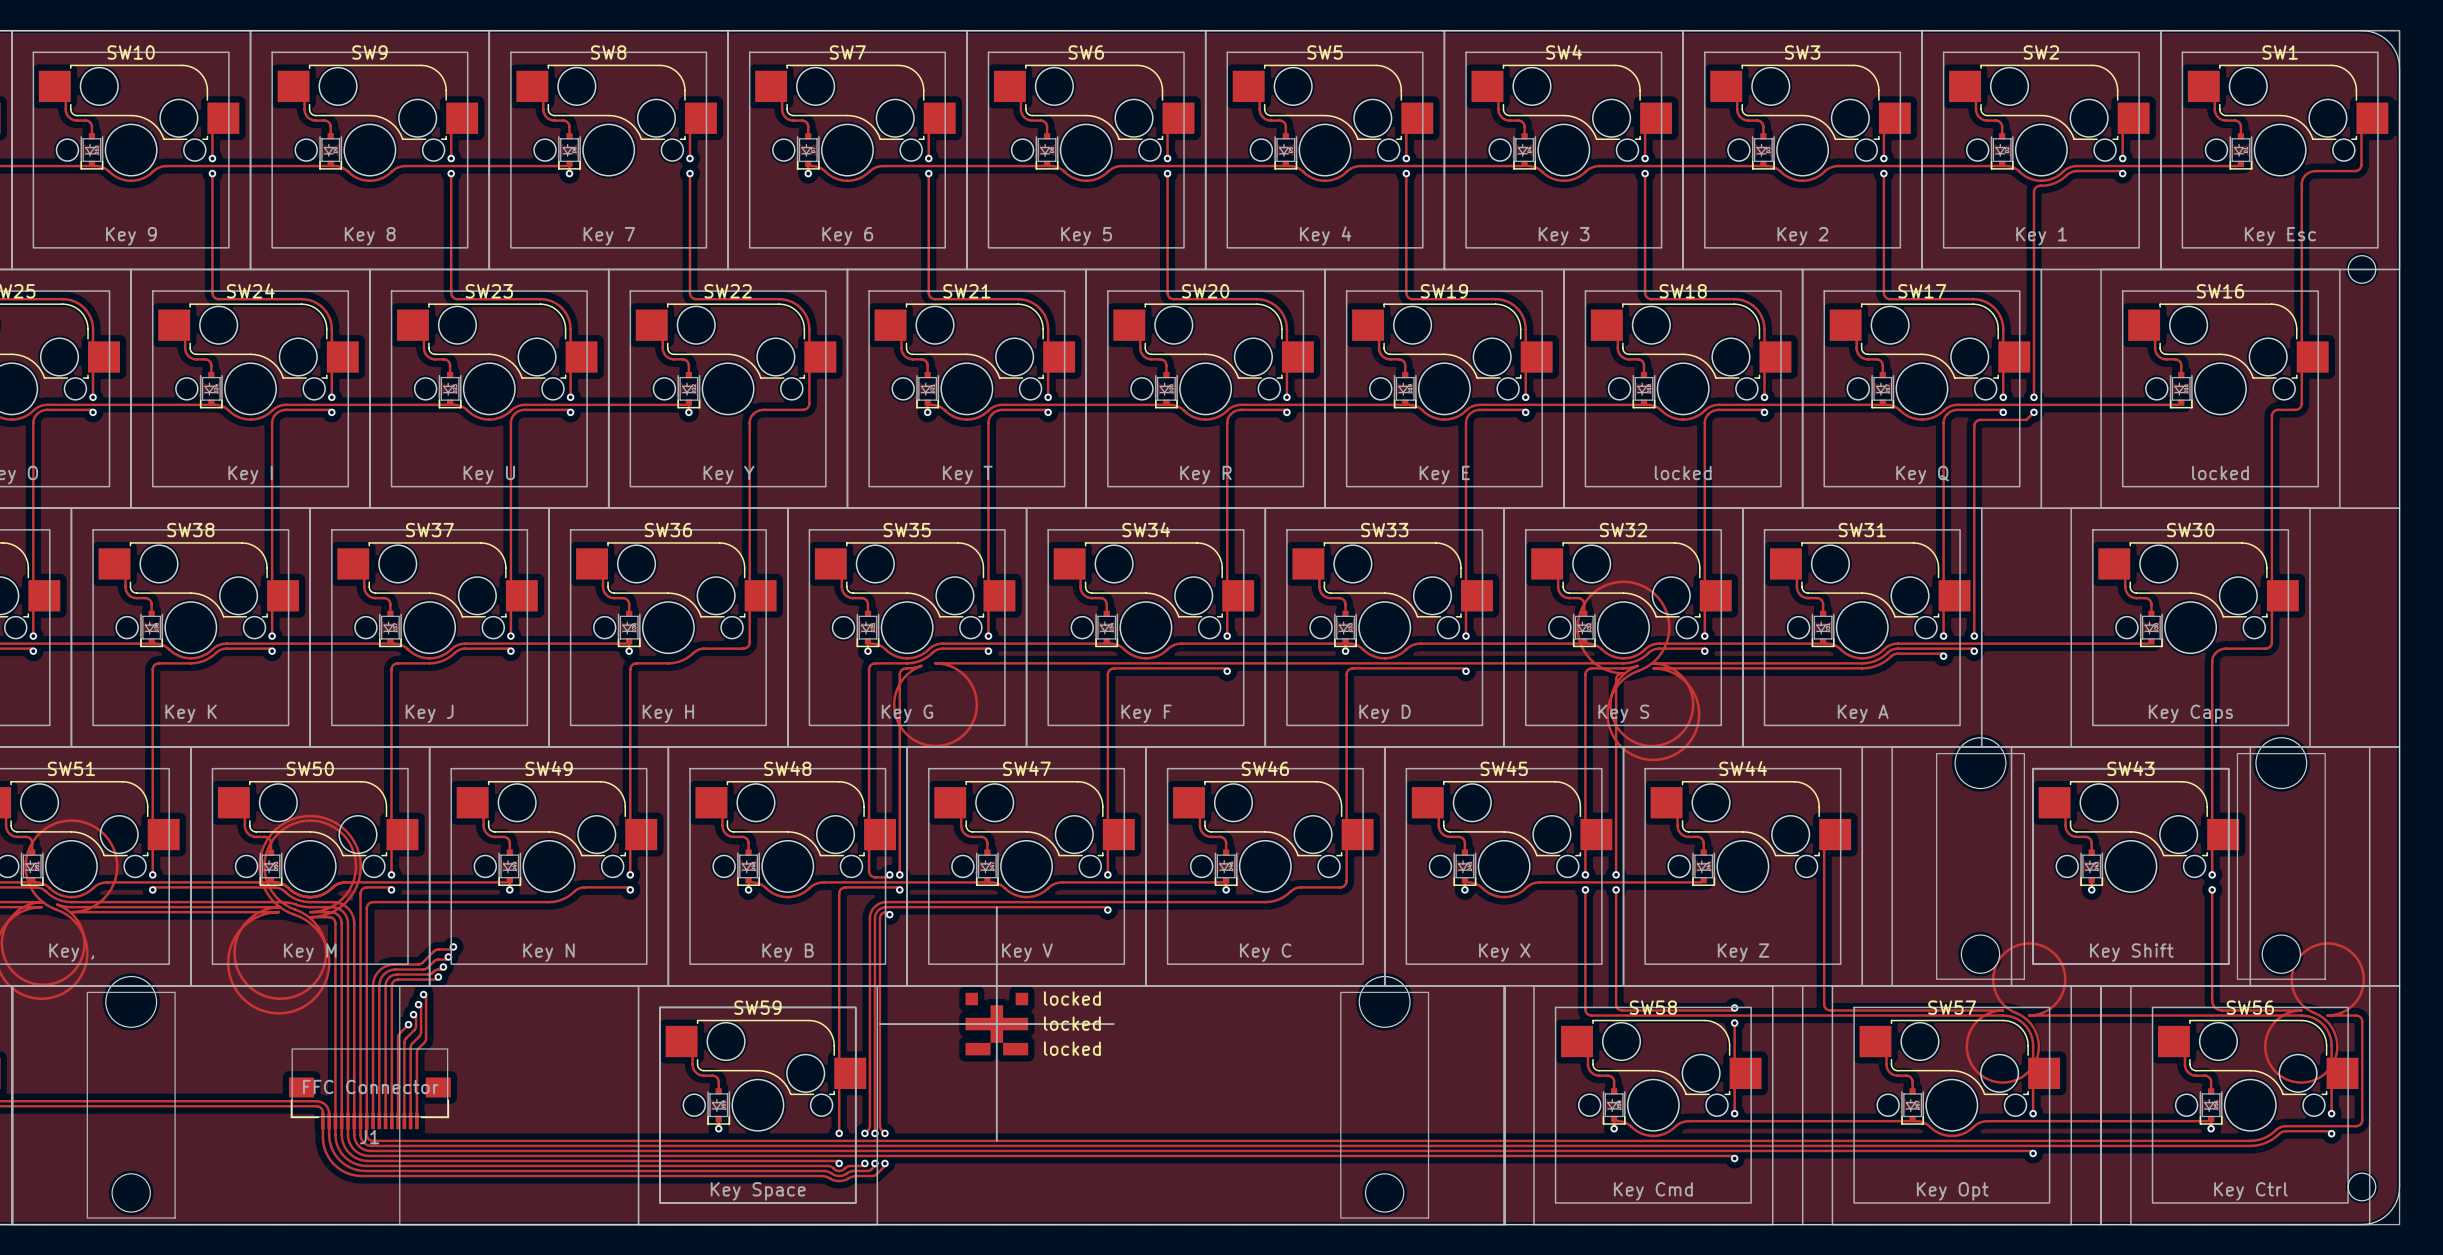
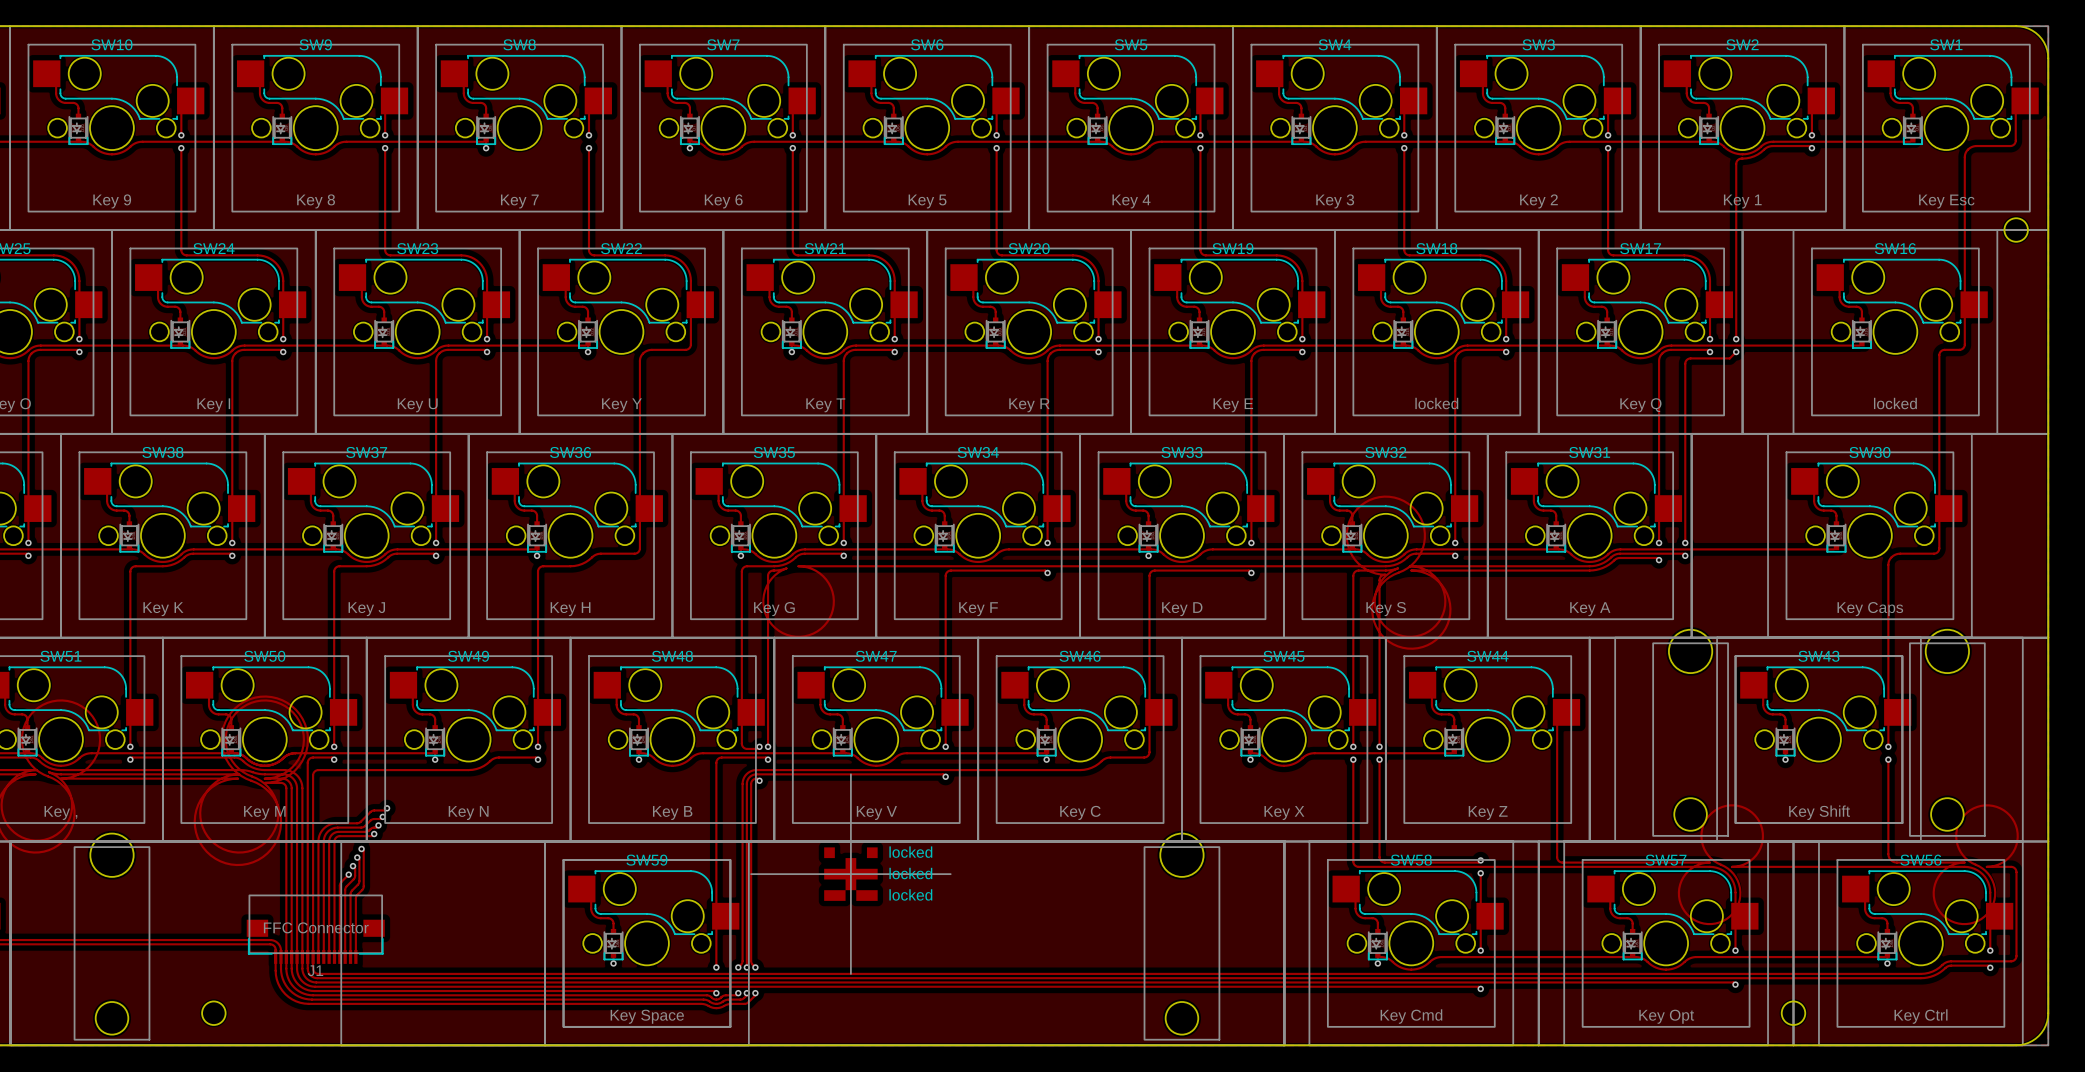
round board edge: none -> [201, 1000, 227, 1026]
round board edge position: (2361, 1186) -> (1793, 1013)

